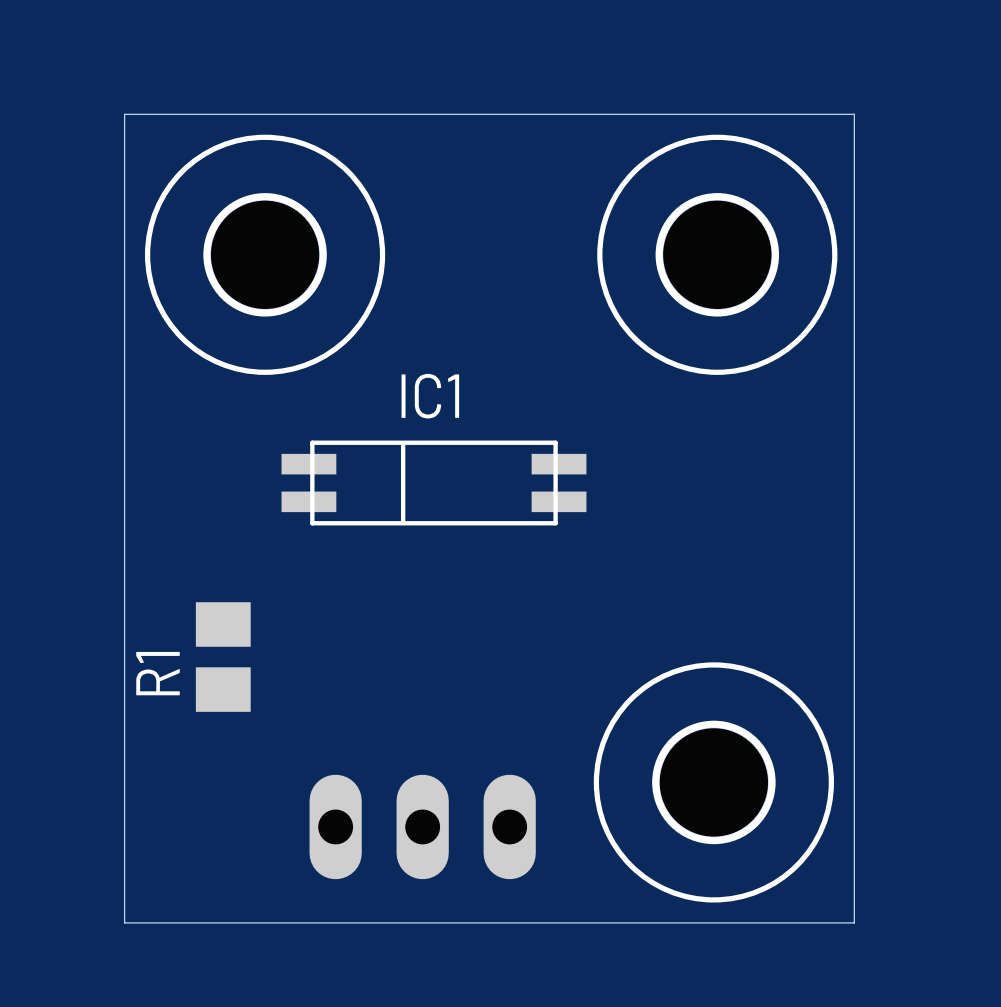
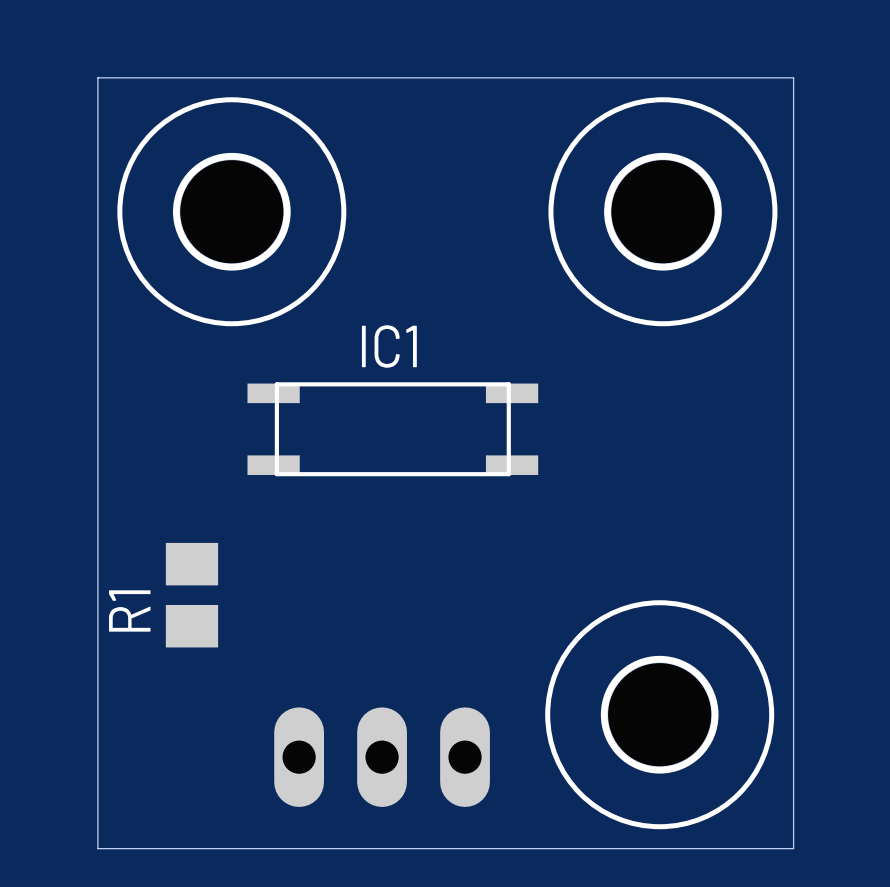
IC1 footprint: [281, 440, 587, 526] -> [247, 382, 539, 477]

